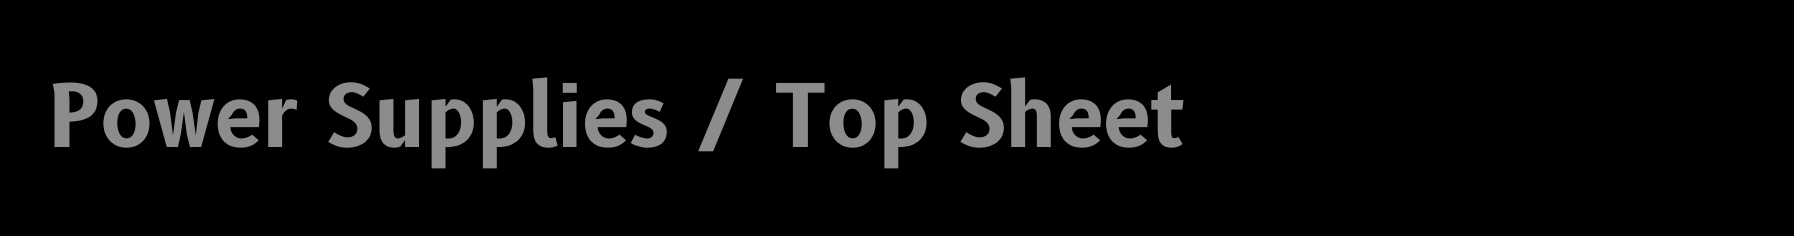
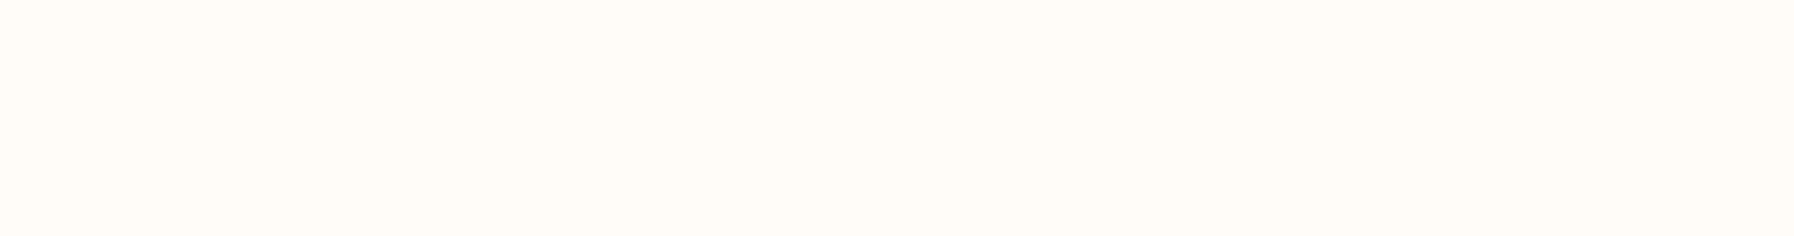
text: Power Supplies / Top Sheet (618, 122) -> none

